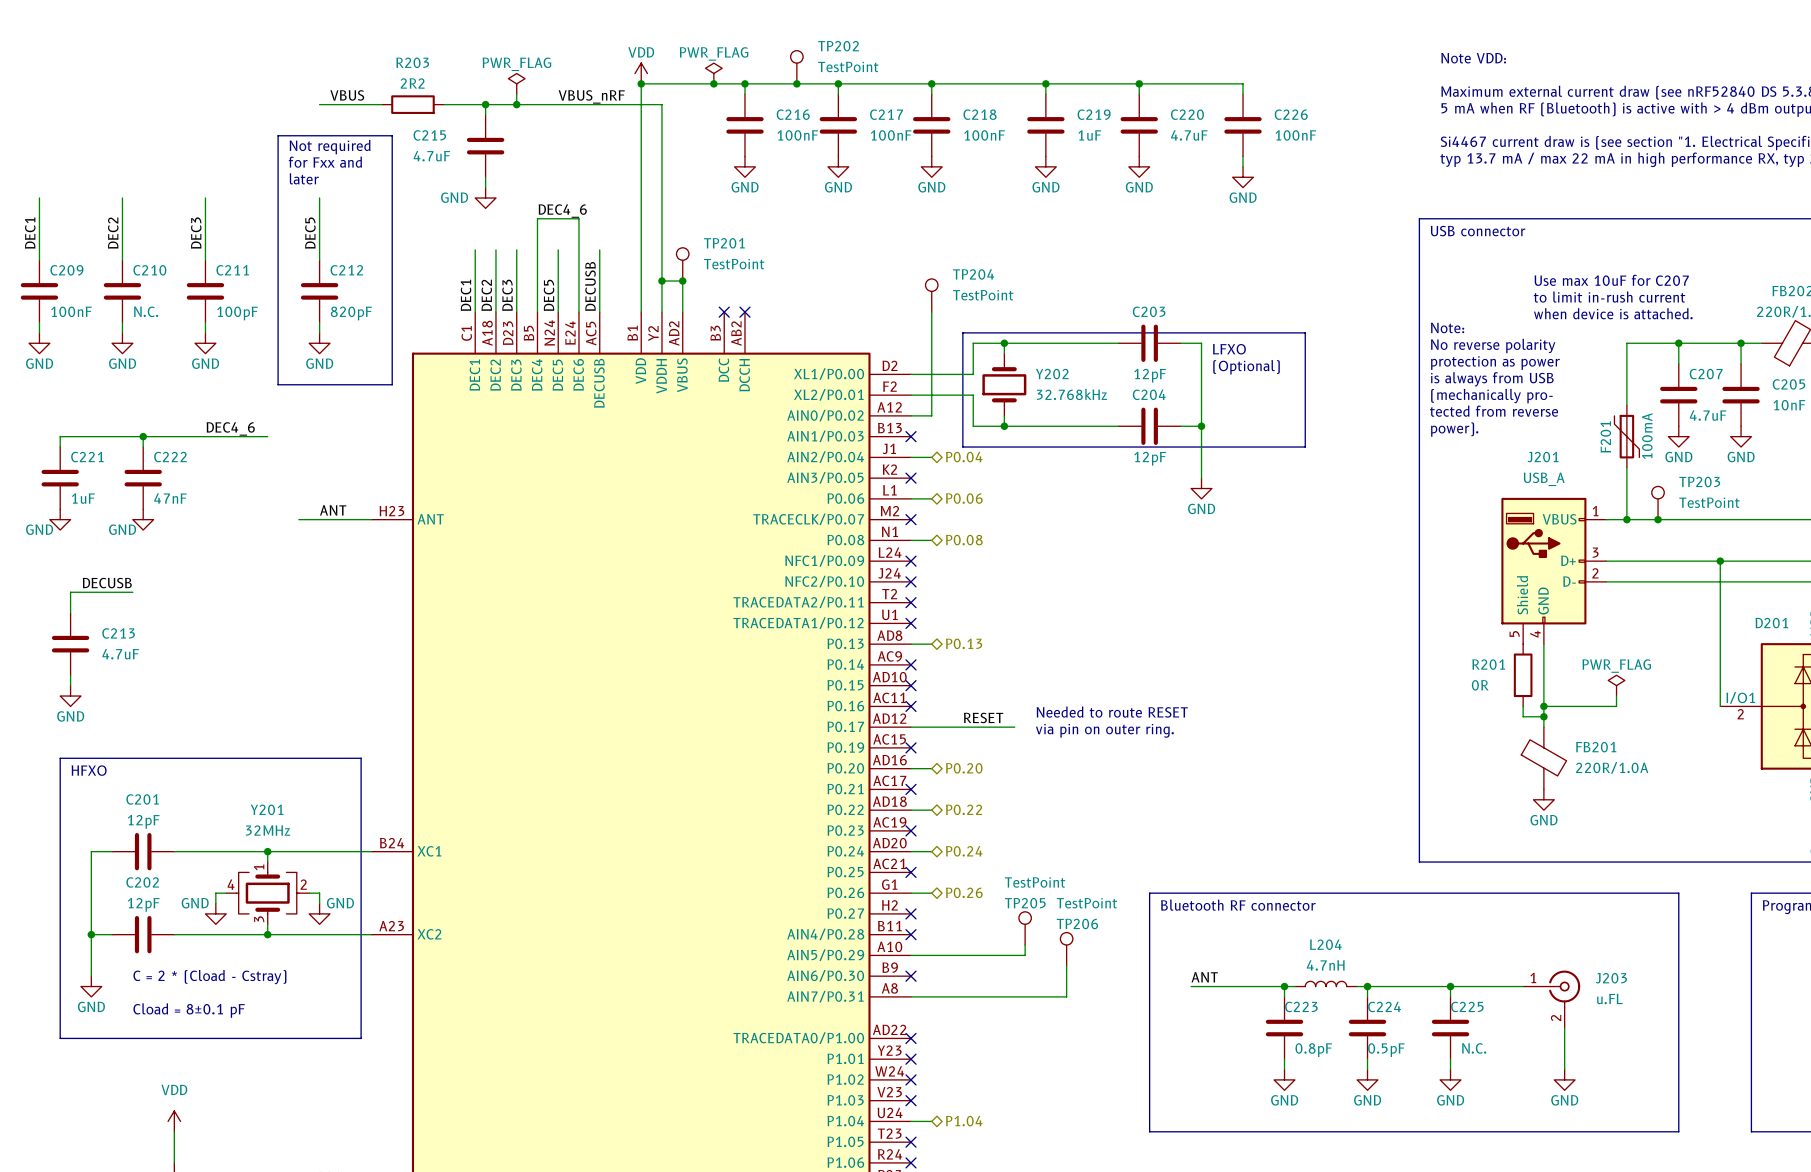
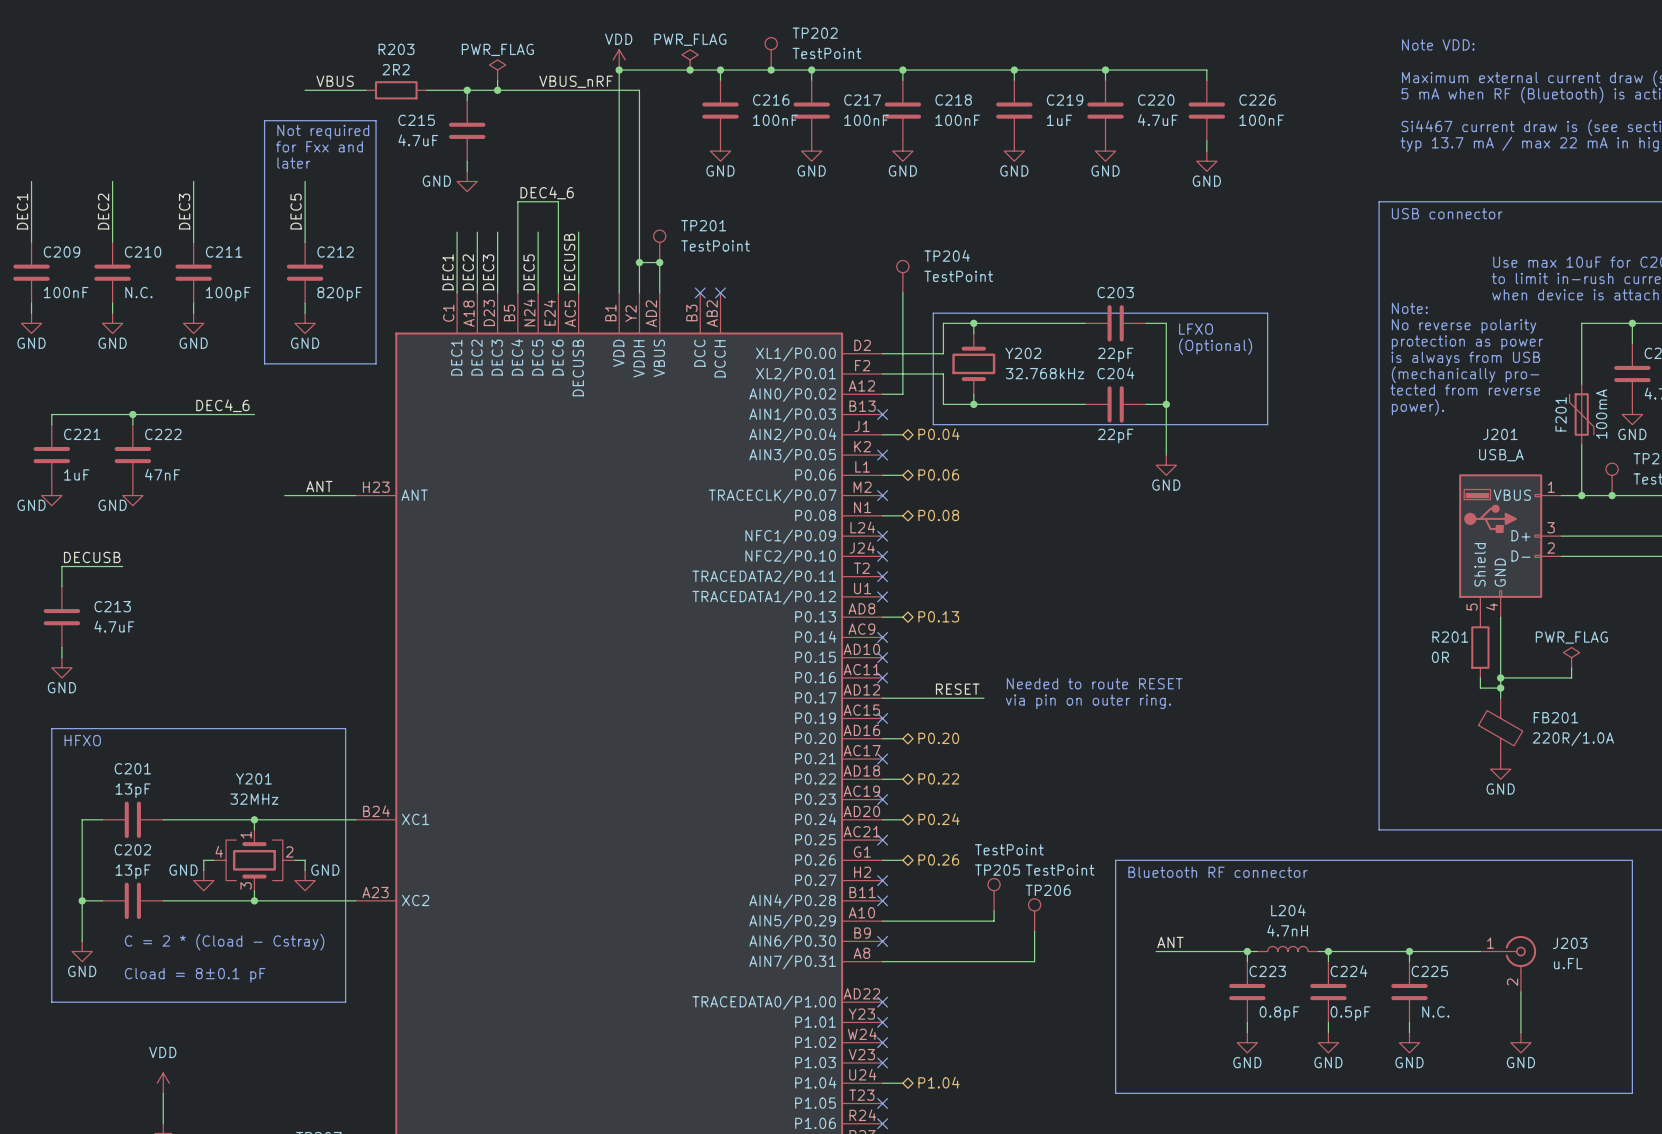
C203 value: 12pF (1150, 375) -> 22pF (1115, 355)
C204 value: 12pF (1150, 458) -> 22pF (1115, 436)
C201 value: 12pF (143, 821) -> 13pF (133, 790)
C202 value: 12pF (143, 904) -> 13pF (133, 871)

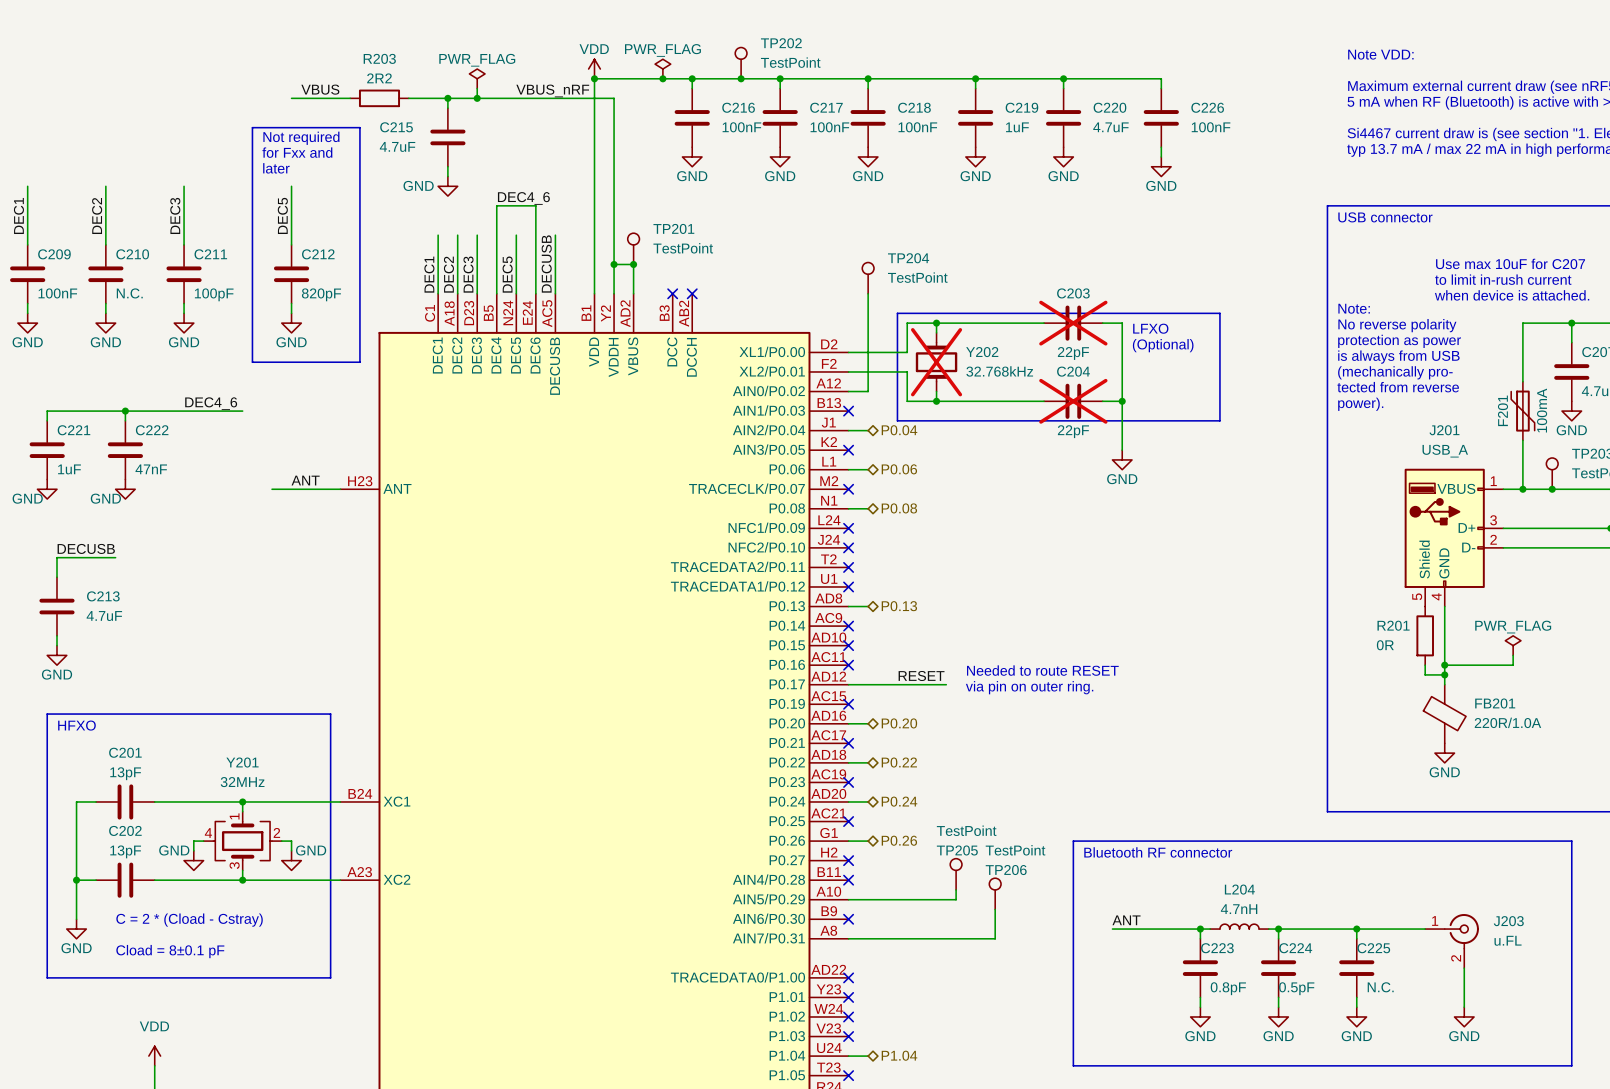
C203 do-not-place cross: none -> (1073, 323)
Y202 do-not-place cross: none -> (936, 362)
C204 do-not-place cross: none -> (1073, 401)

